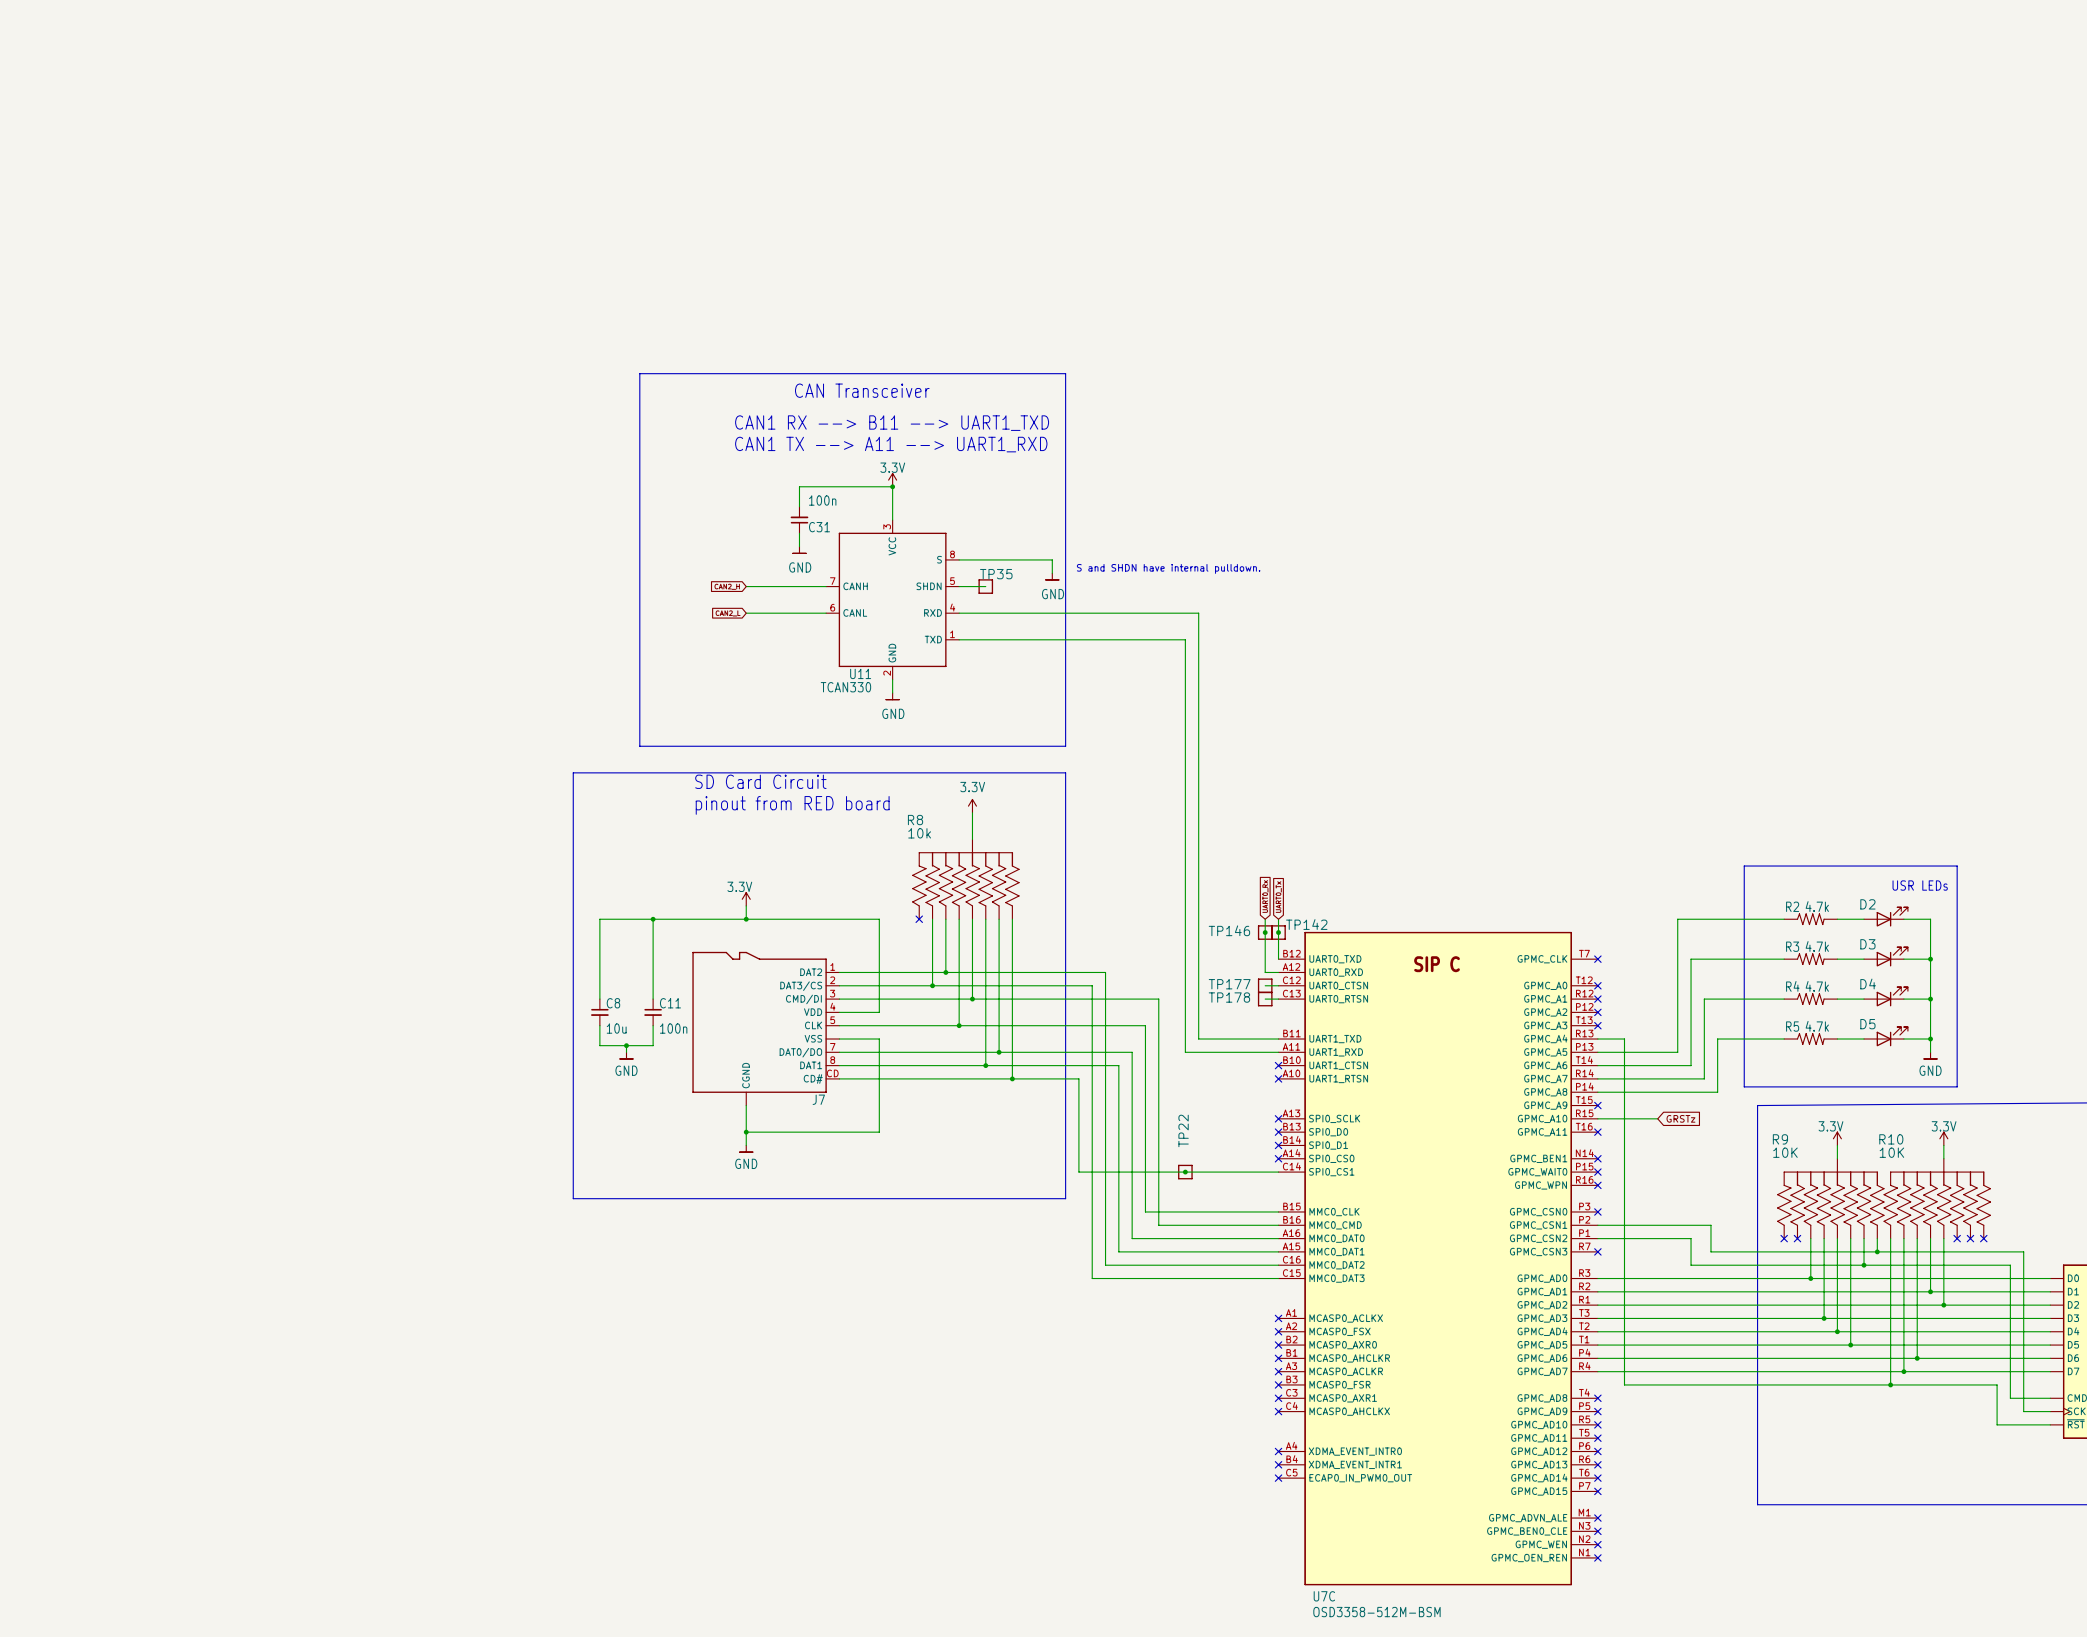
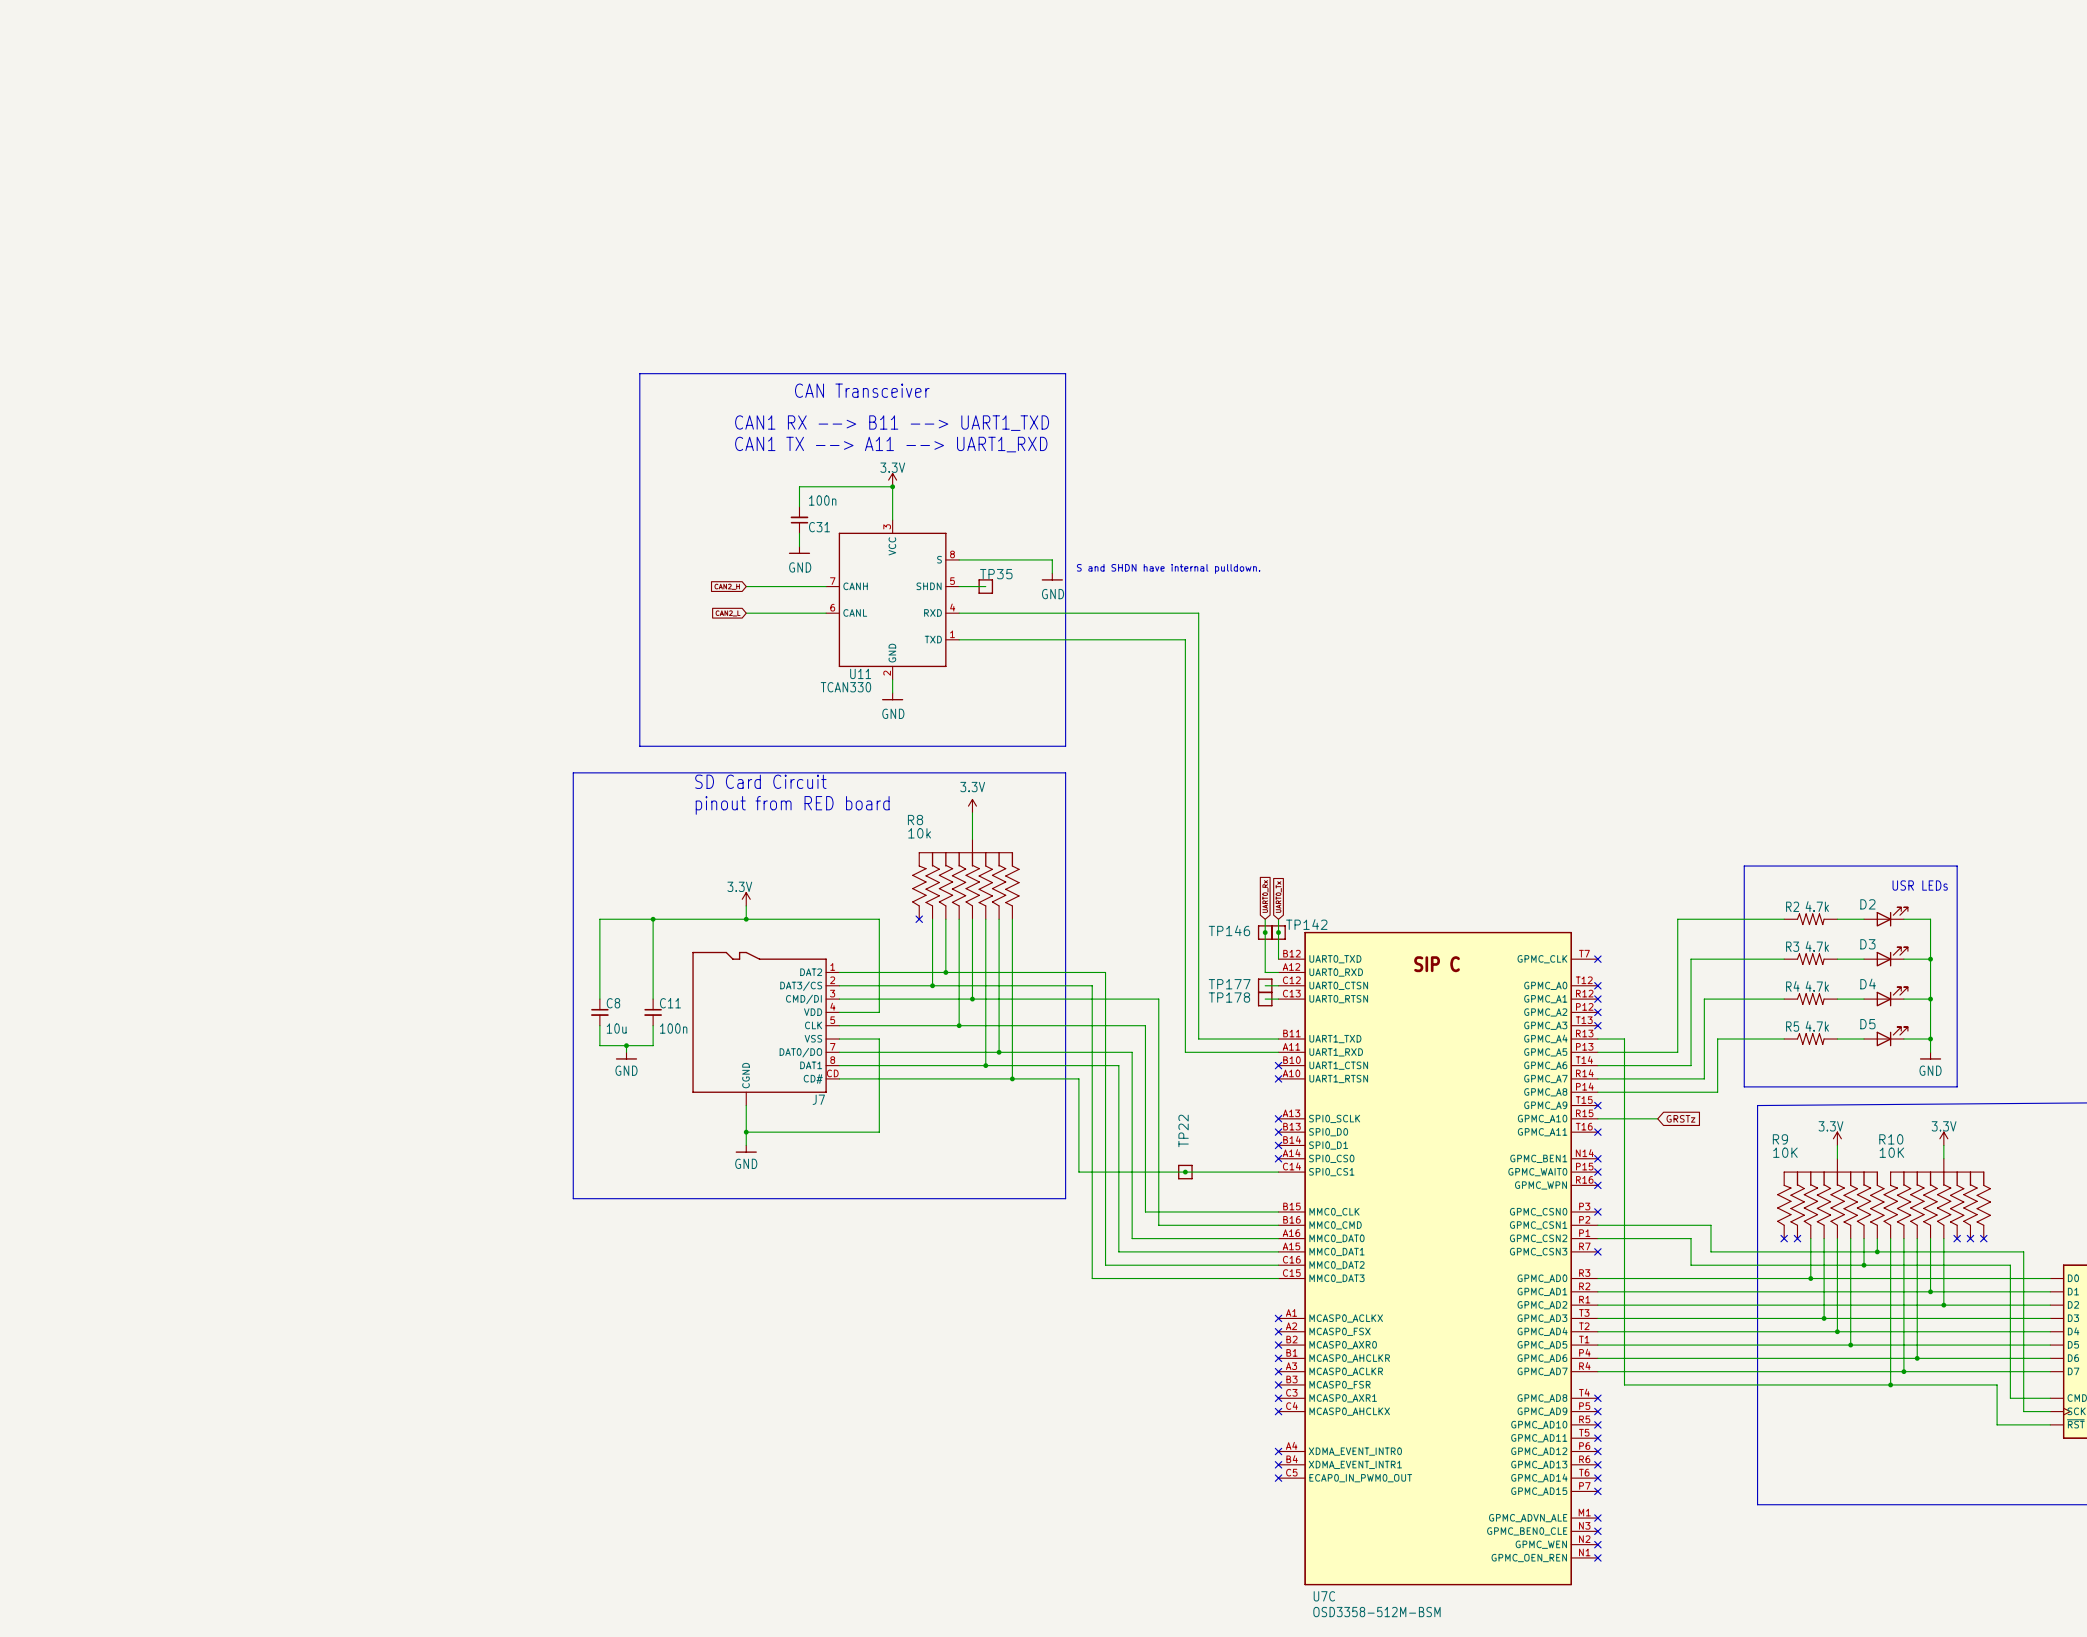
power symbol shape: [792, 546, 807, 554] -> [788, 546, 811, 554]
power symbol shape: [1045, 573, 1059, 580] -> [1041, 573, 1063, 581]
power symbol shape: [885, 693, 900, 700] -> [881, 693, 904, 701]
power symbol shape: [619, 1052, 634, 1059] -> [615, 1052, 638, 1060]
power symbol shape: [1923, 1052, 1938, 1059] -> [1919, 1052, 1942, 1060]
power symbol shape: [739, 1145, 753, 1153] -> [735, 1145, 757, 1153]

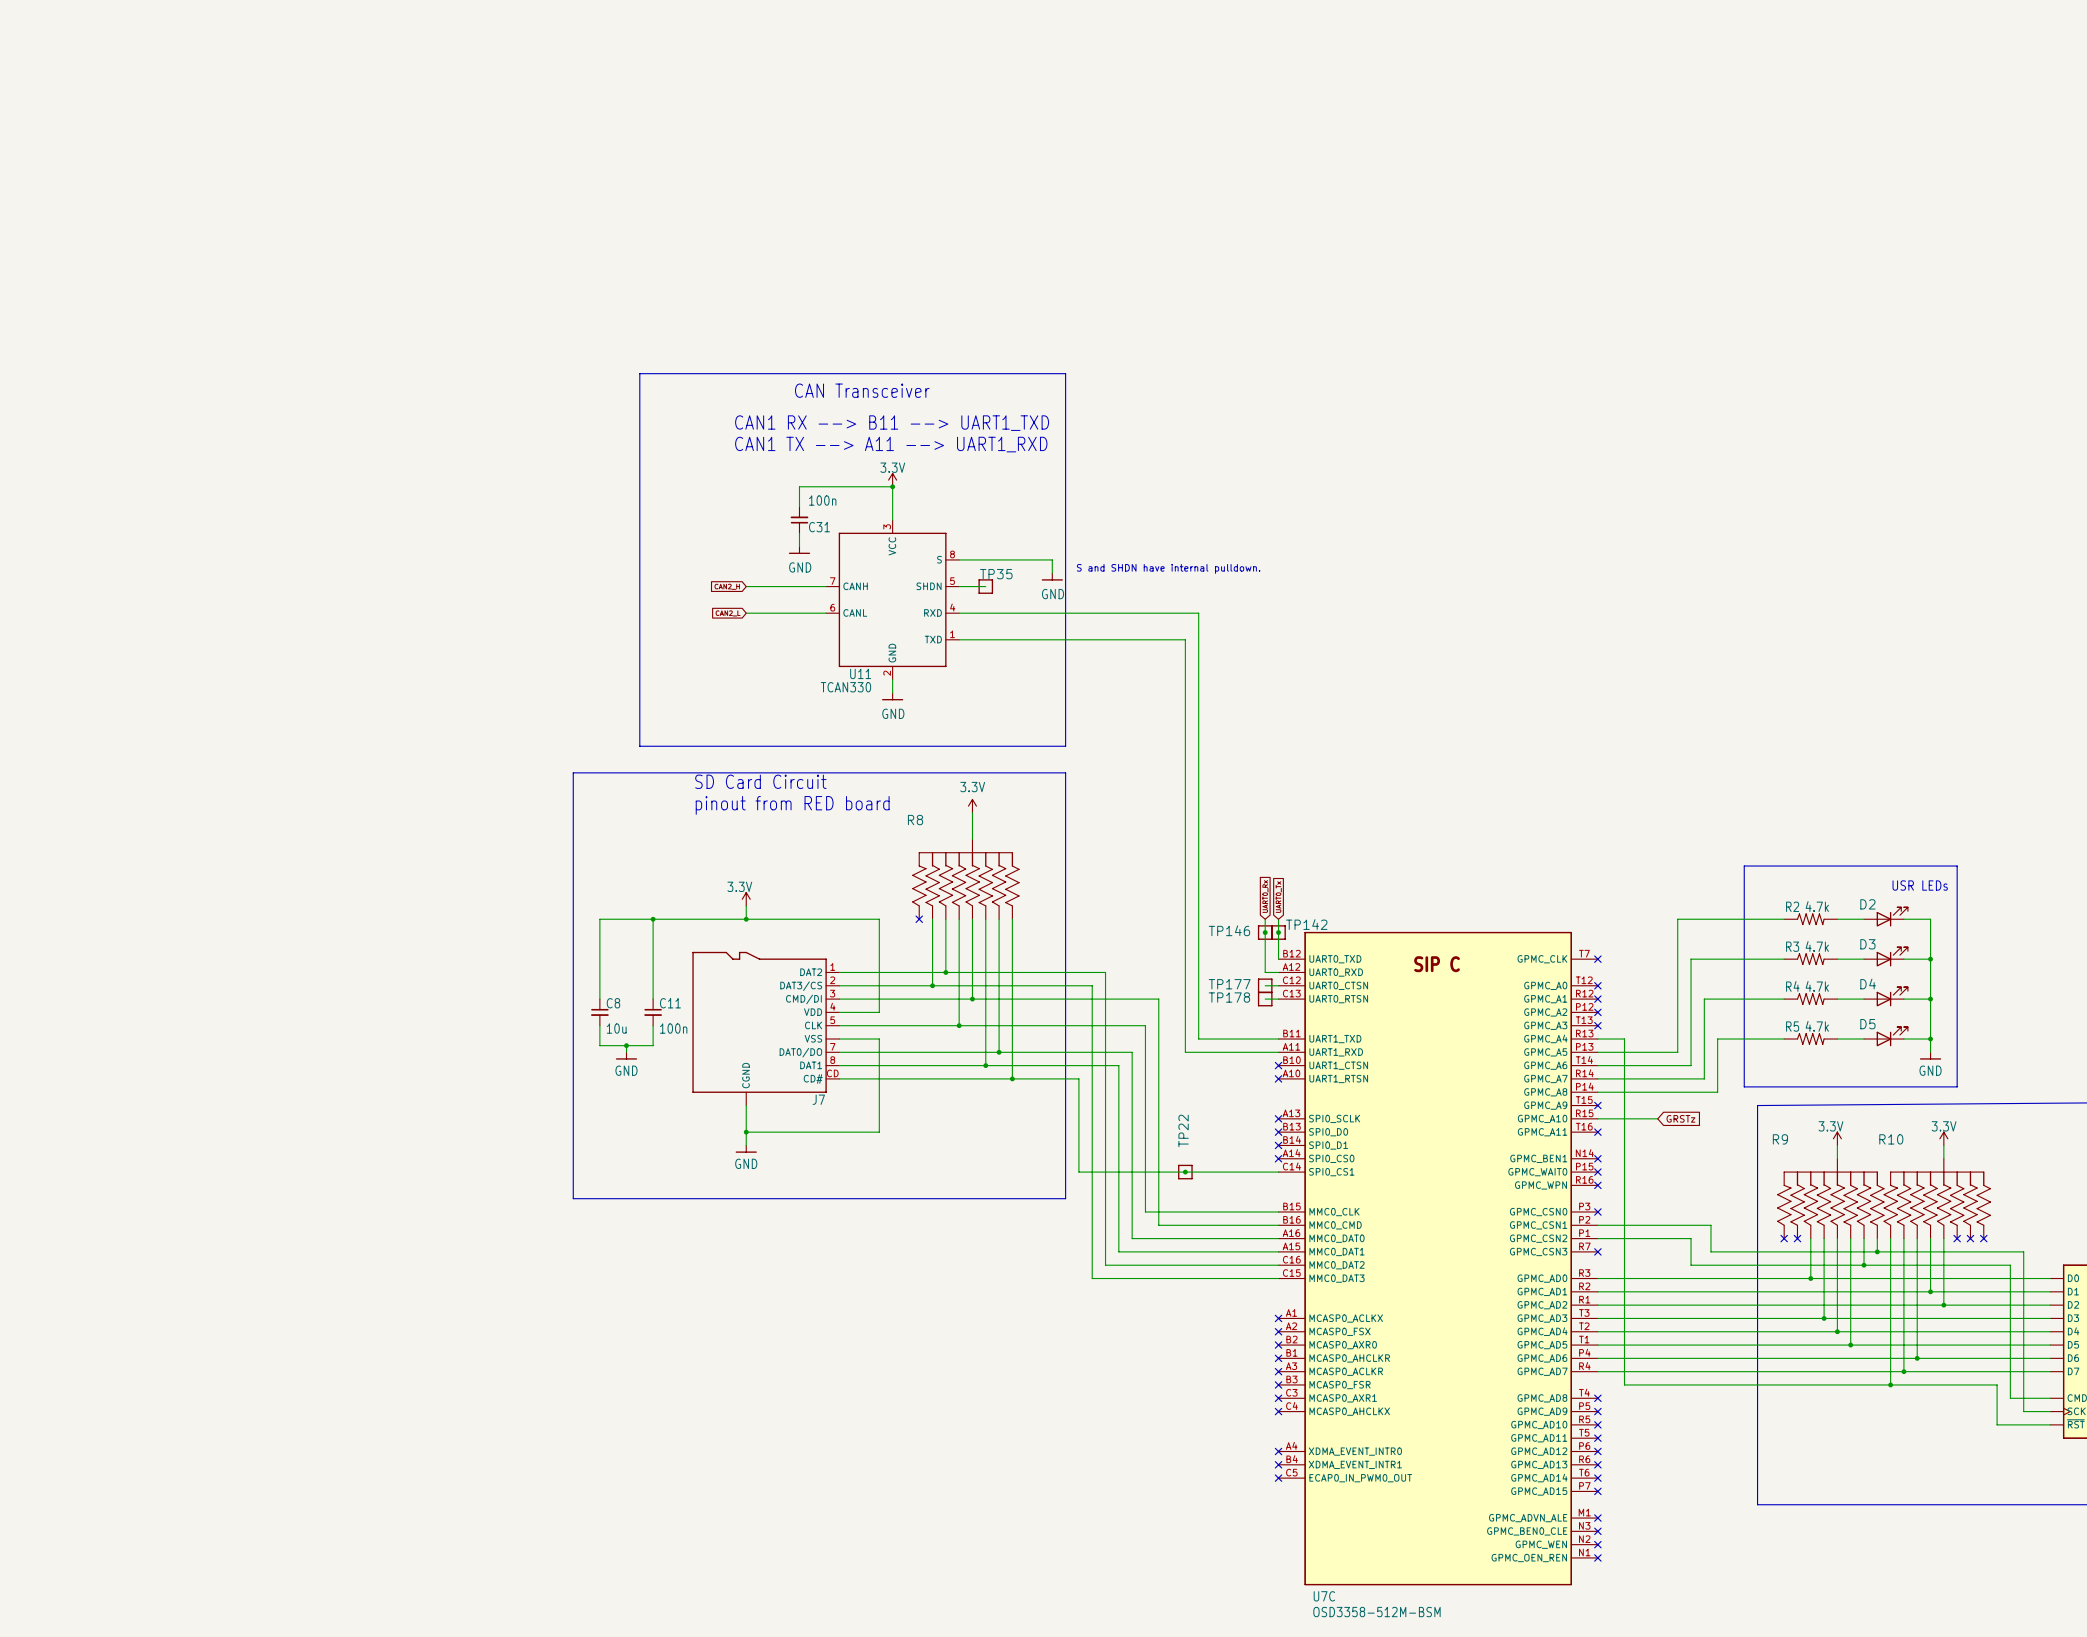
R8 value: 10k (919, 833) -> none
R9 value: 10K (1785, 1152) -> none
R10 value: 10K (1891, 1152) -> none

